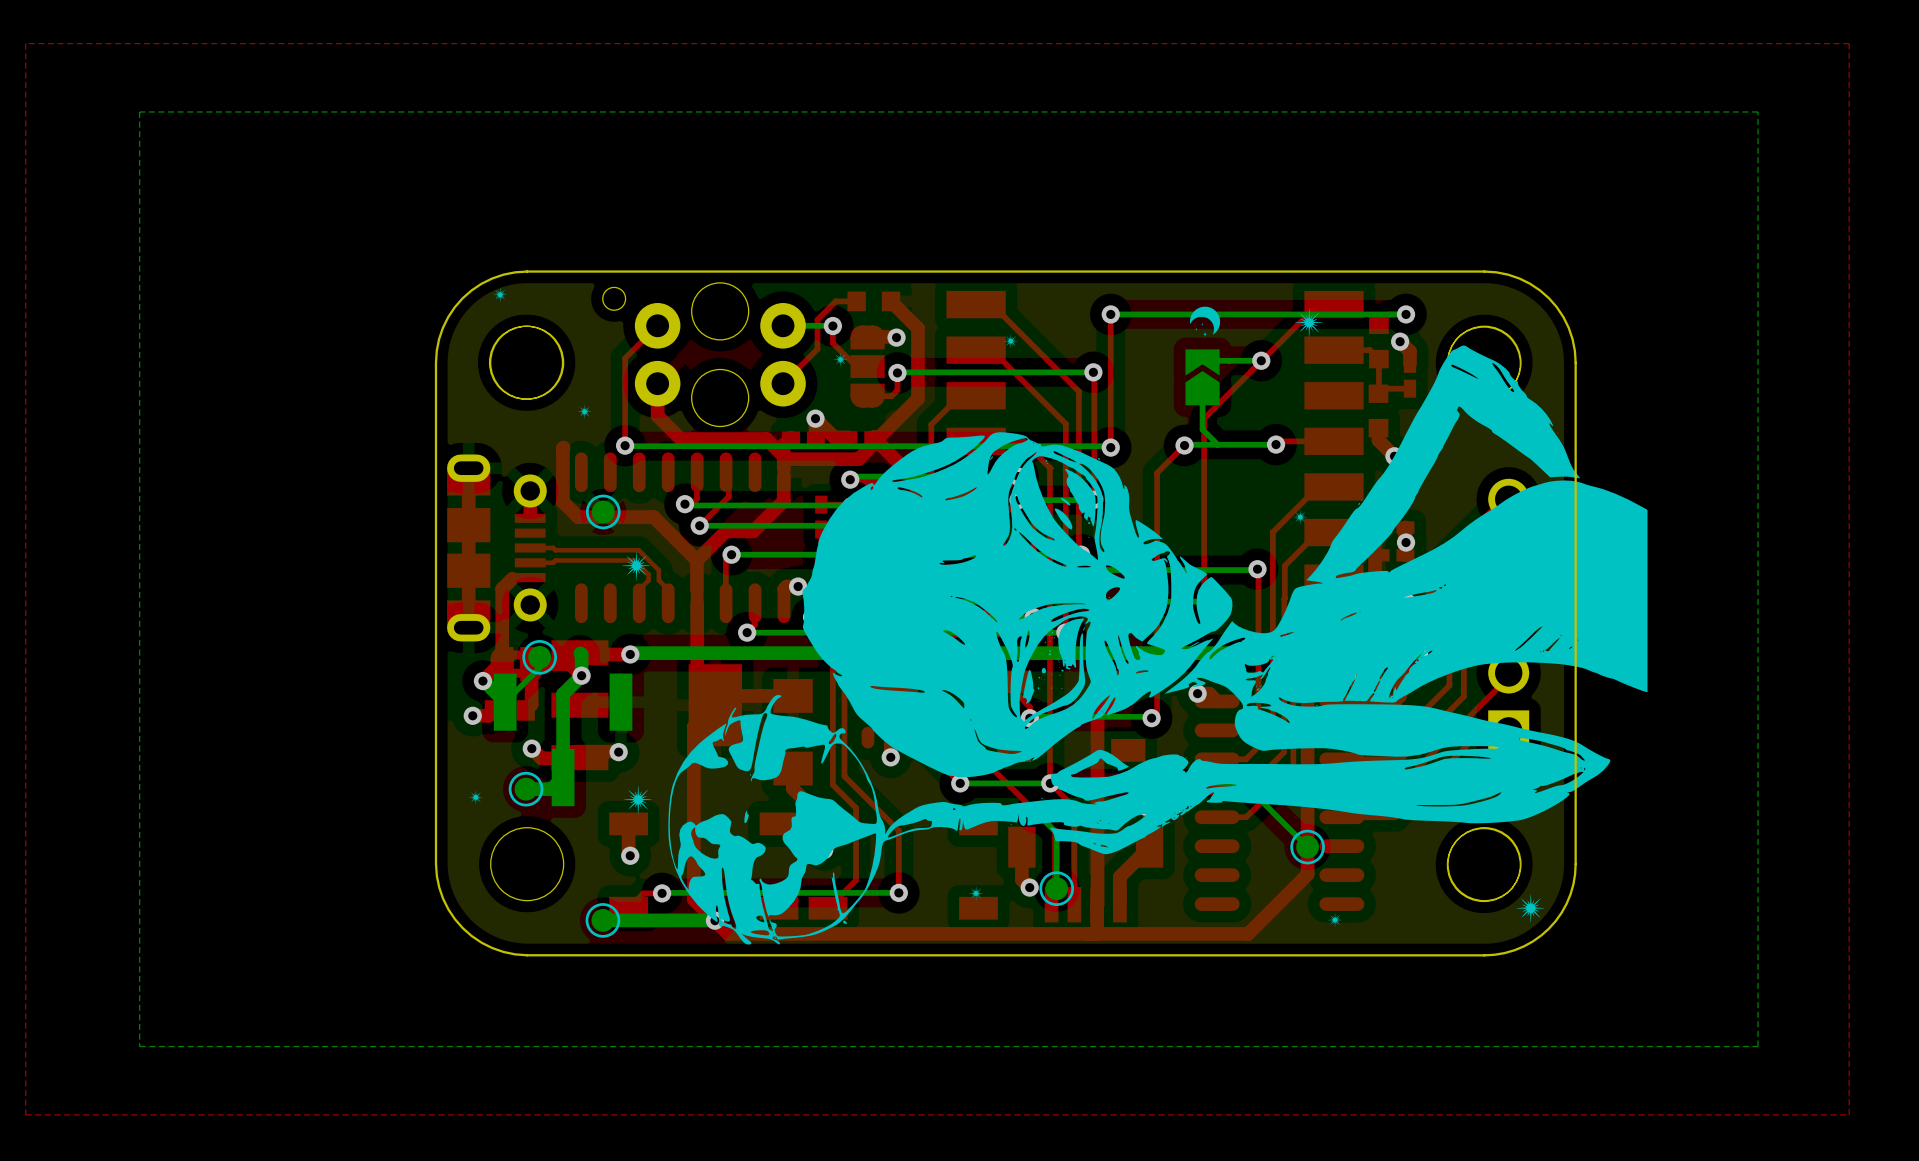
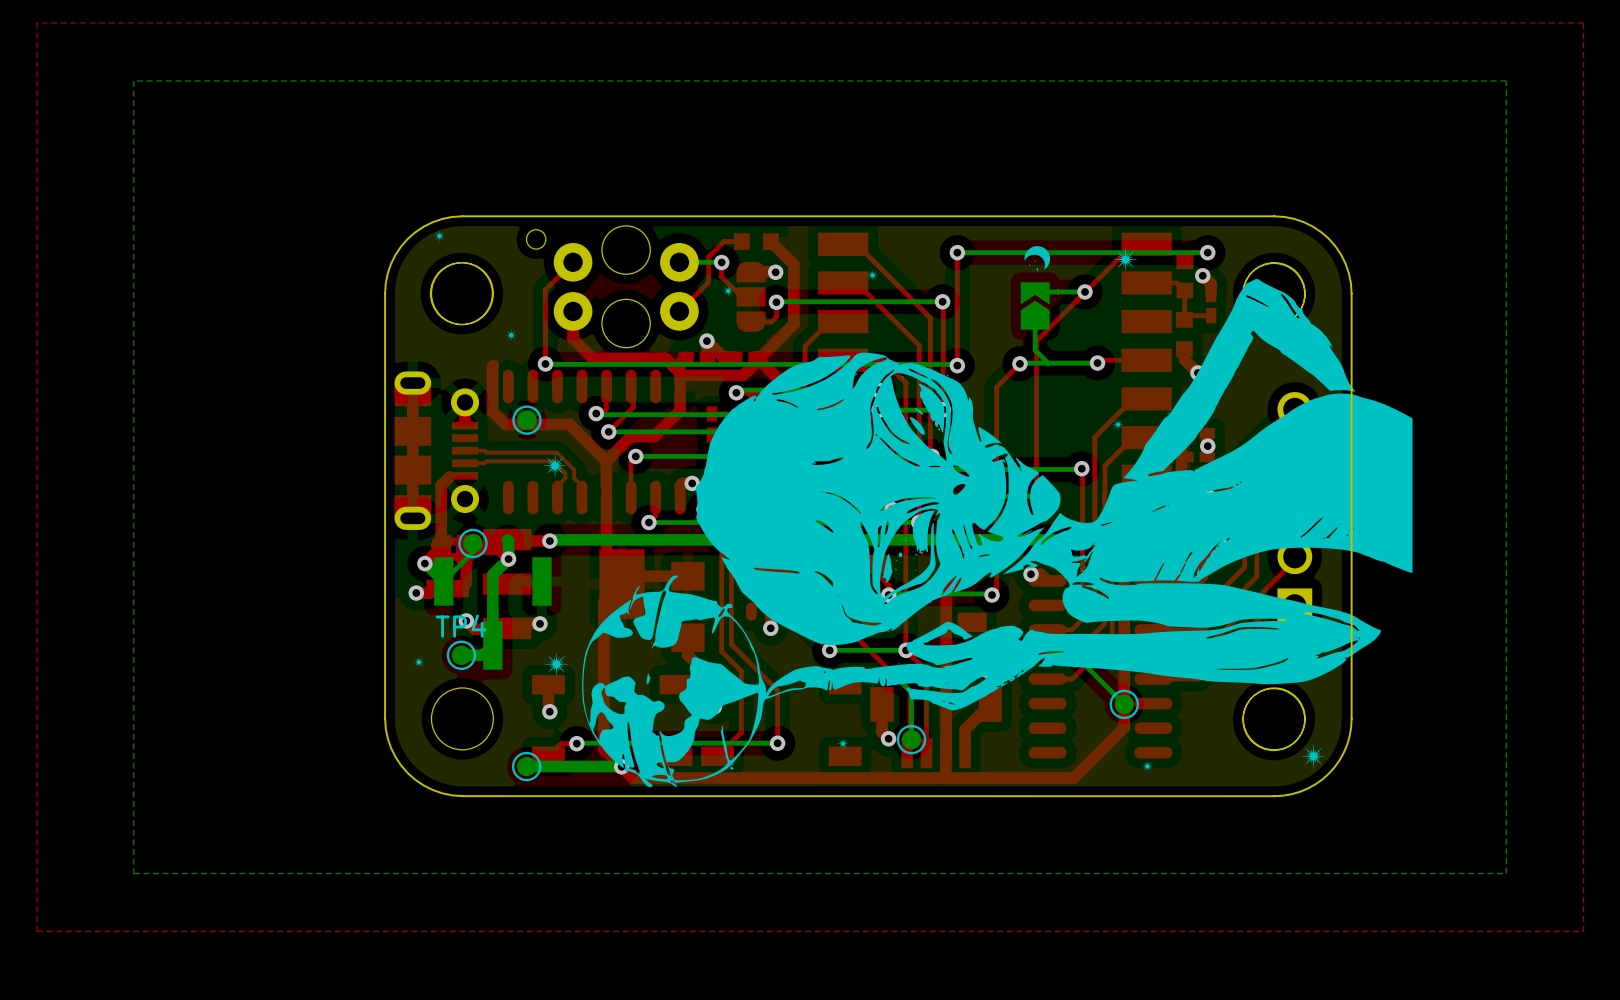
TP4 name: none -> TP4 (460, 626)

